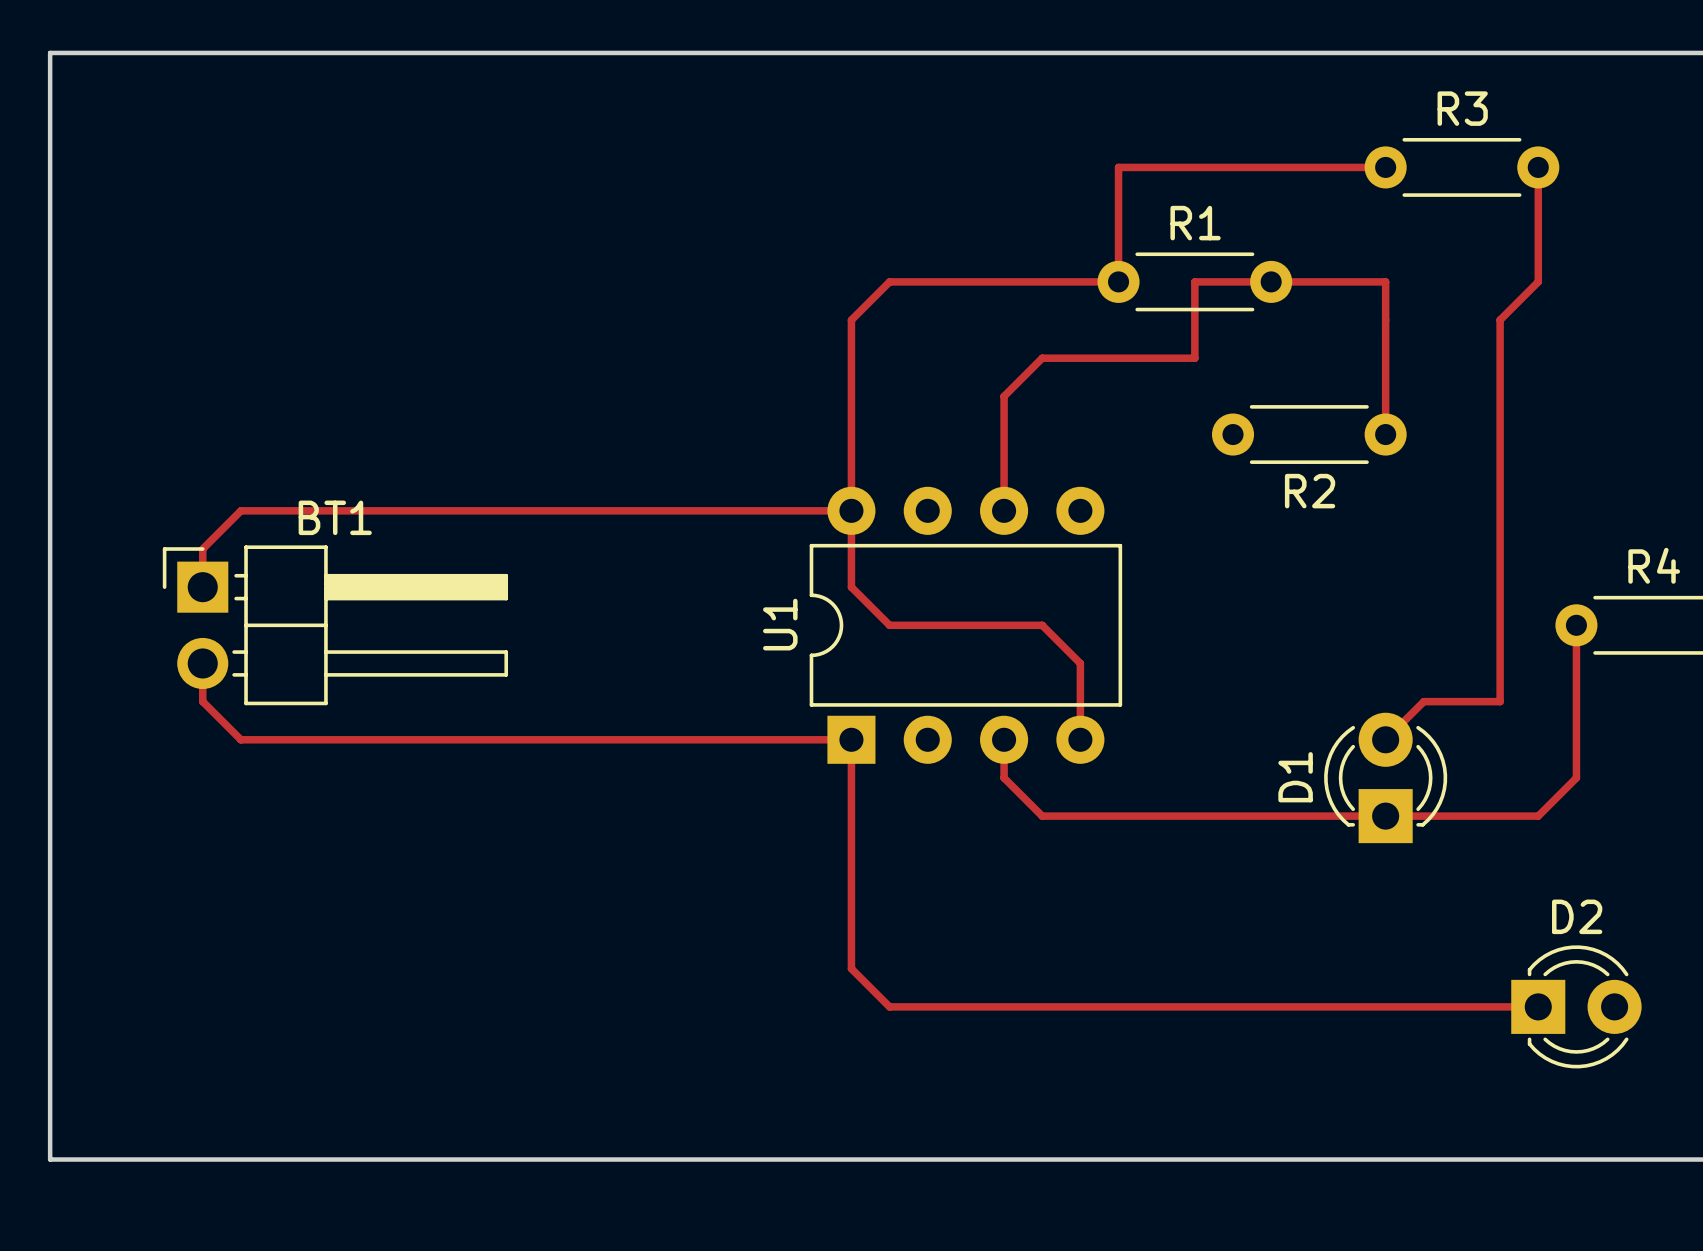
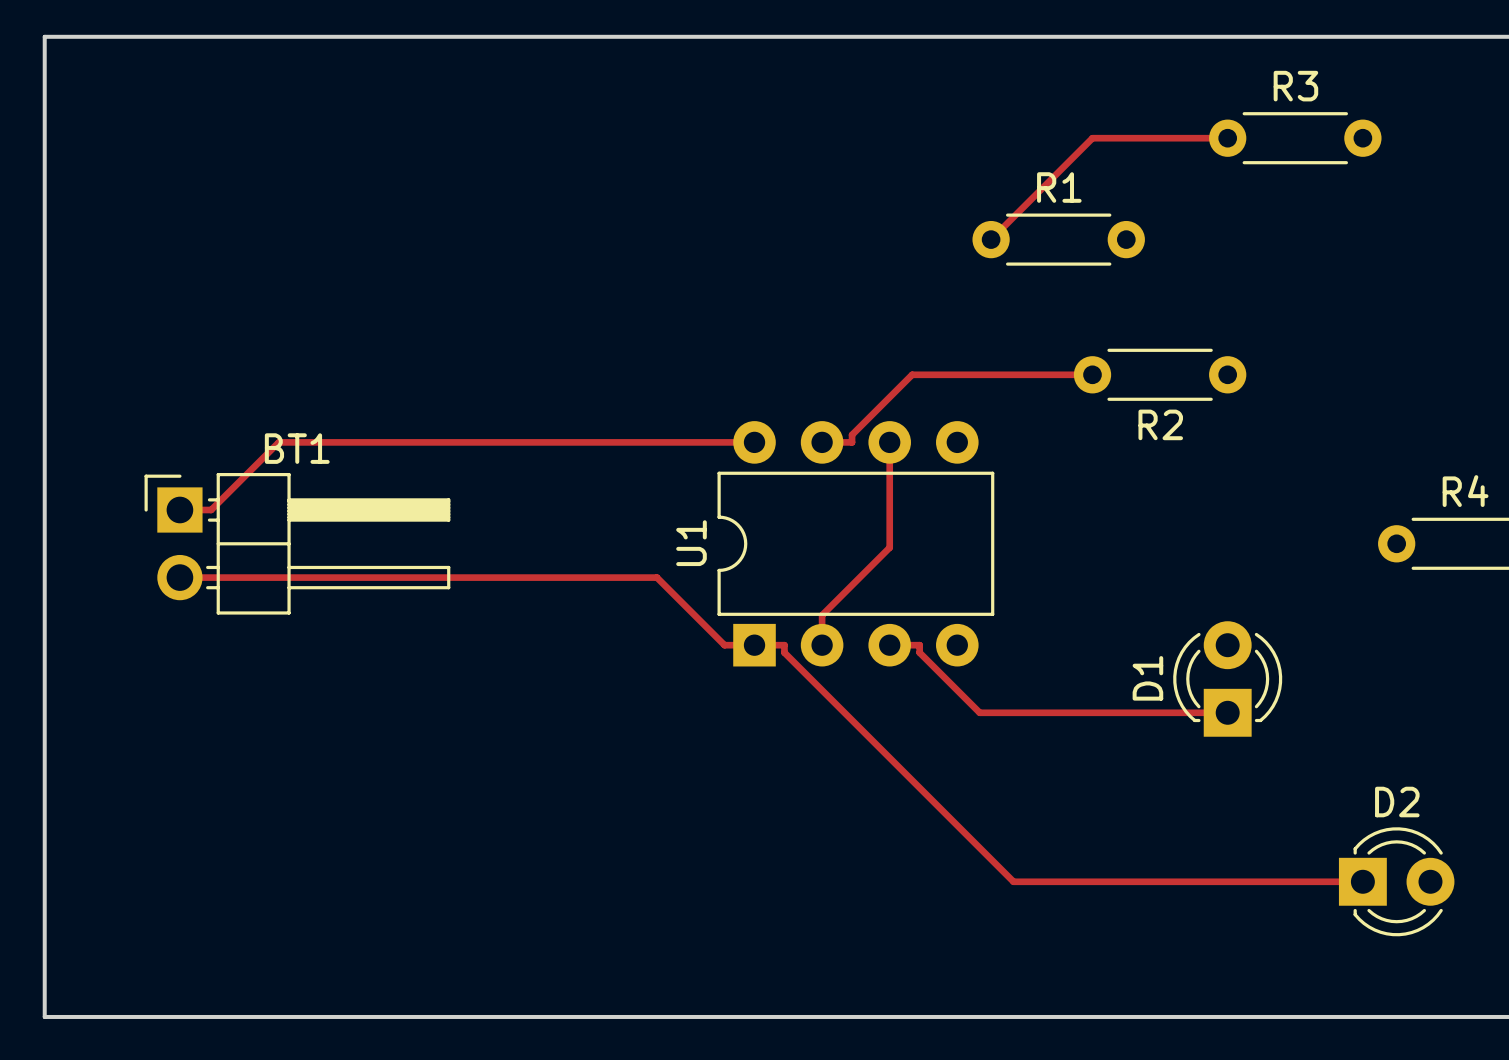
track: (1233, 167) (1118, 167) (1118, 281) (889, 281) (851, 320) (851, 587) (889, 625) (1042, 625) (1080, 663) (1080, 739) -> (1092, 138) (991, 239)
track: (1538, 167) (1538, 281) (1500, 320) (1500, 701) (1423, 701) (1385, 739) -> none
track: none -> (1092, 374) (912, 374) (852, 434) (852, 442) (822, 442)
track: (1385, 434) (1385, 281) (1194, 281) (1194, 358) (1042, 358) (1004, 396) (1004, 510) -> (822, 645) (822, 615) (889, 547) (889, 442)
track: (314, 510) (240, 510) (202, 549) (202, 587) -> (278, 442) (211, 509) (179, 509)
track: (1576, 625) (1576, 777) (1538, 816) (1385, 816) -> none
track: (202, 663) (202, 701) (240, 739) (817, 739) -> (179, 577) (656, 577) (724, 645)
track: (851, 739) (851, 968) (889, 1006) (1143, 1006) -> (754, 645) (784, 645) (784, 652) (1013, 881)
track: (1004, 739) (1004, 777) (1042, 816) (1105, 816) -> (889, 645) (919, 645) (919, 652) (979, 712)

